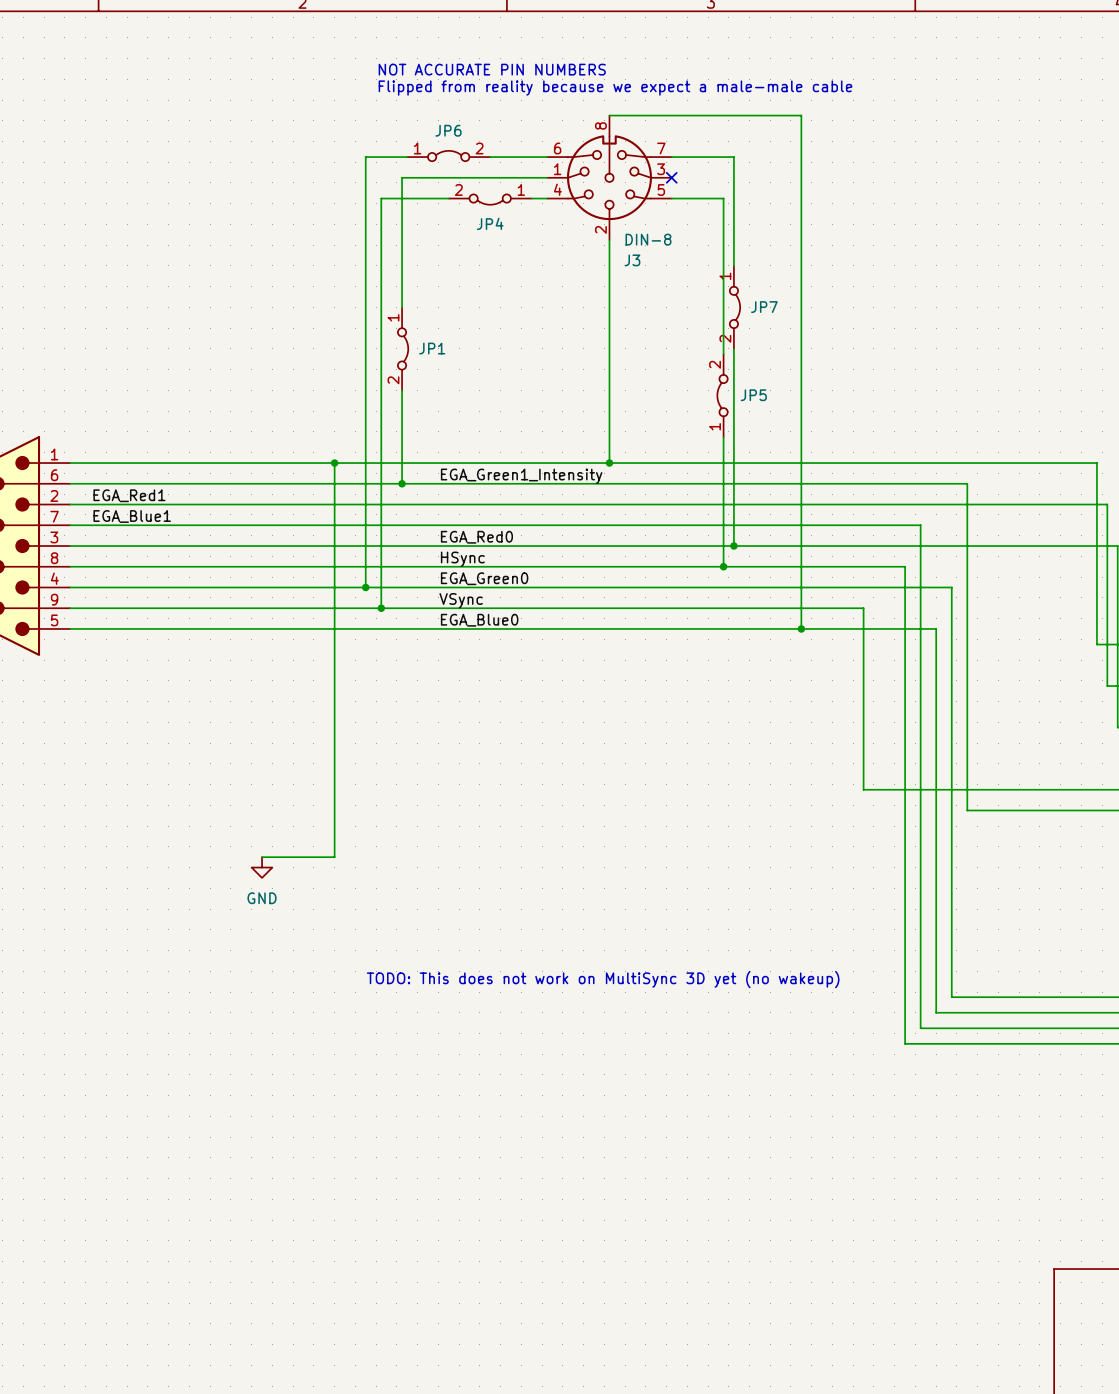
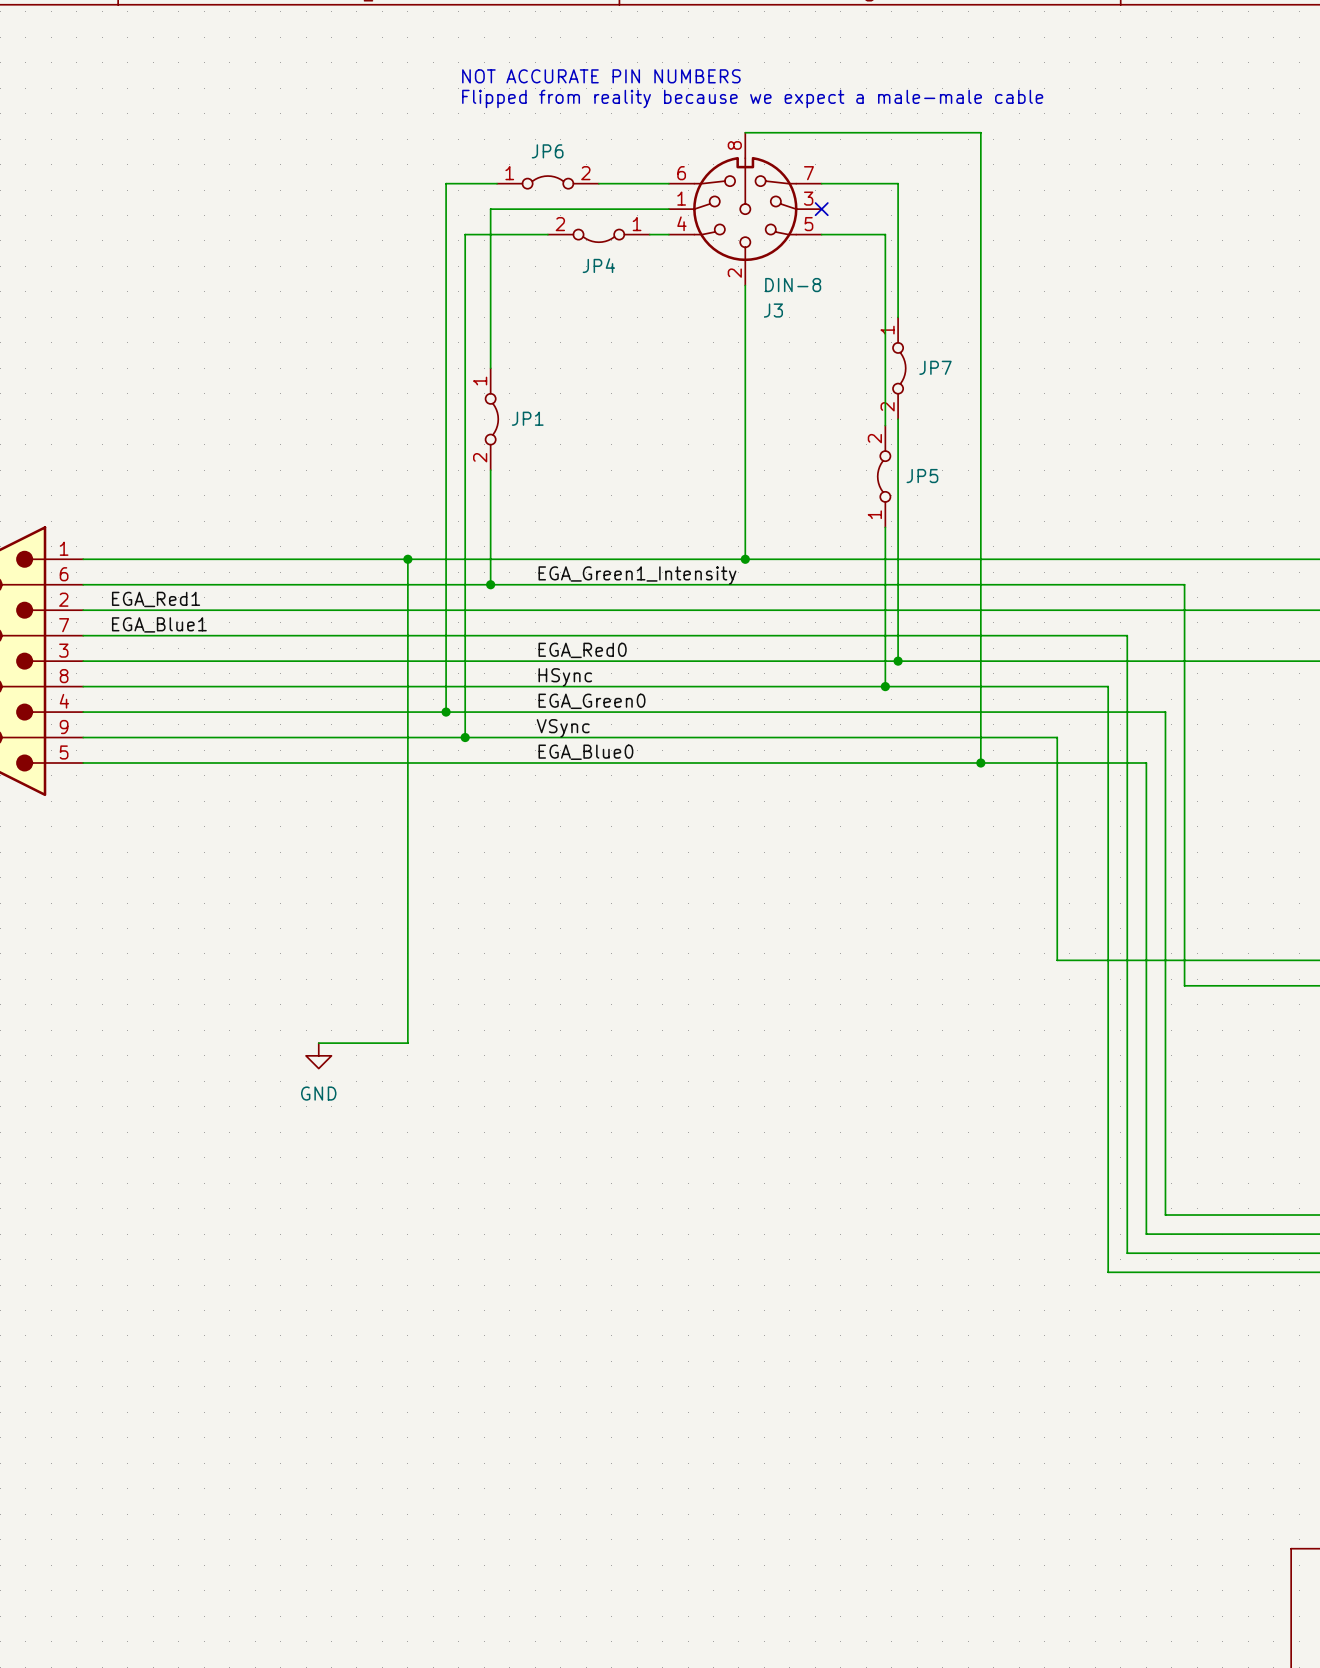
text: TODO: This does not work on MultiSync 3D yet (no wakeup) (603, 979) -> none

